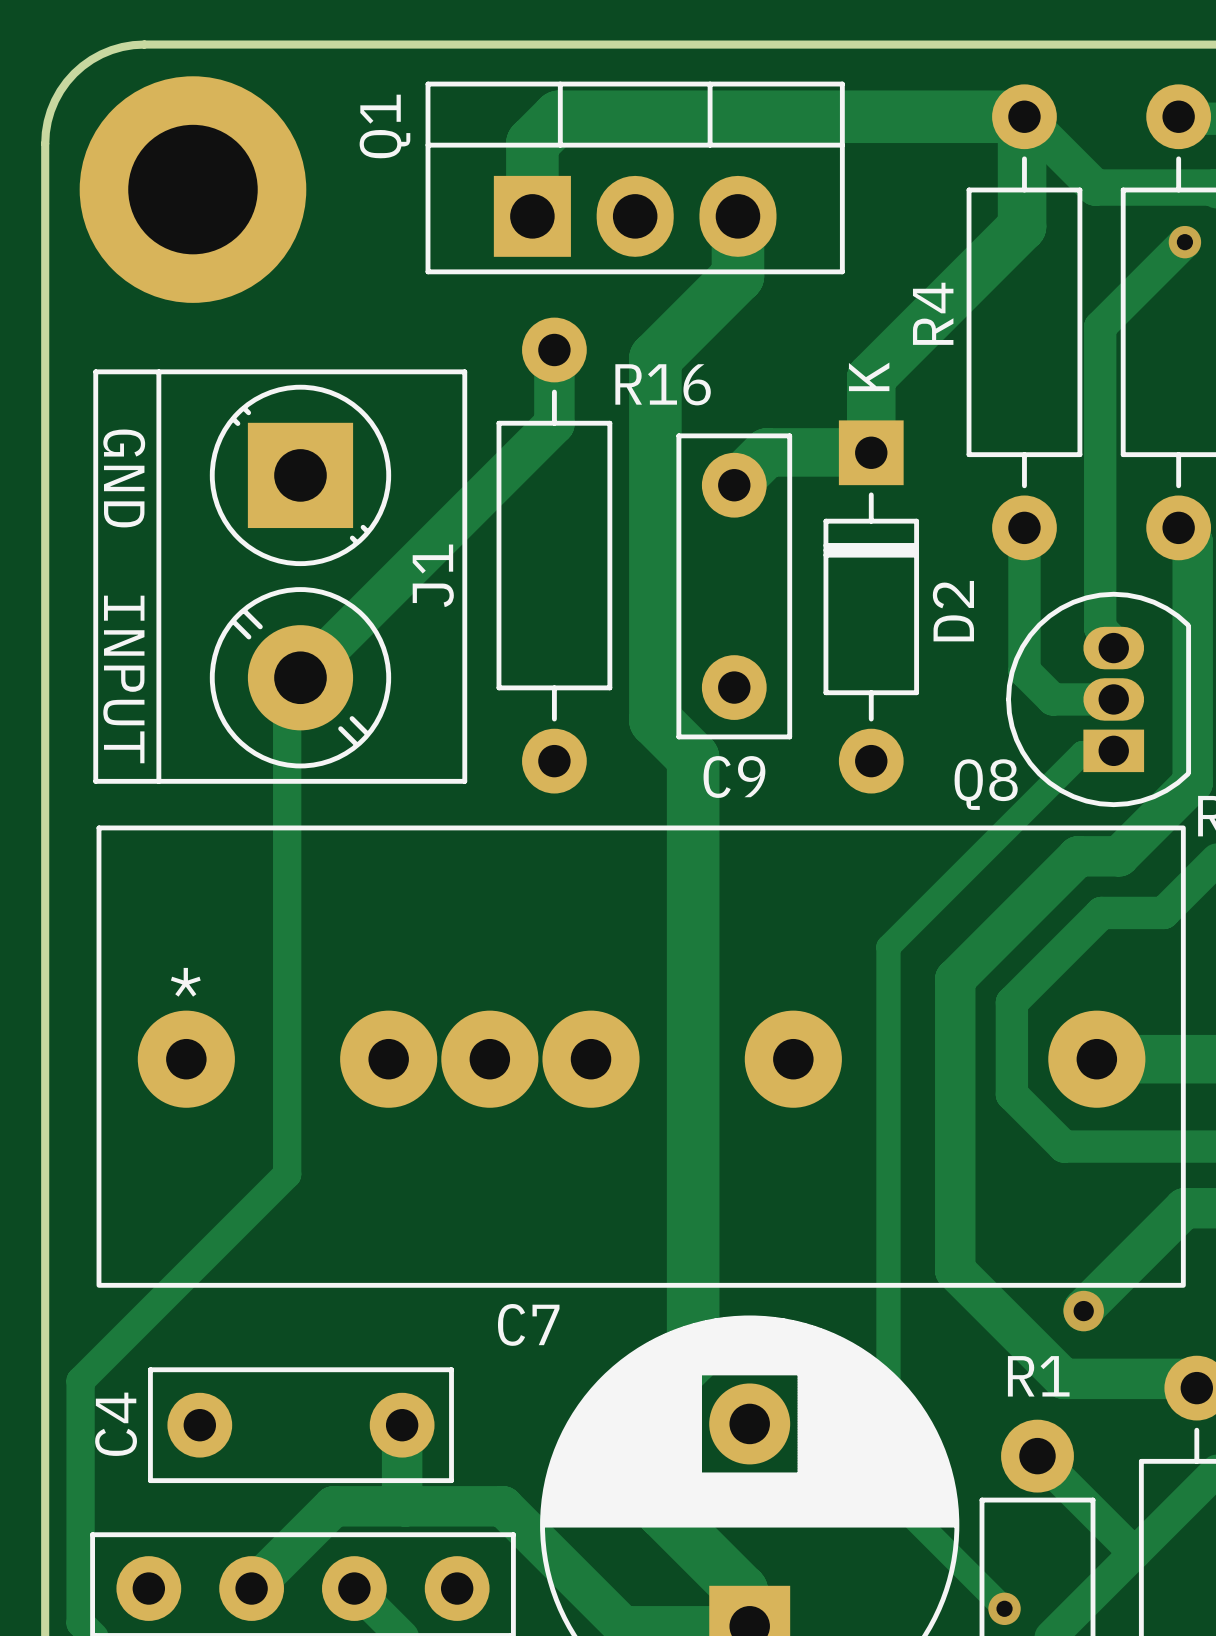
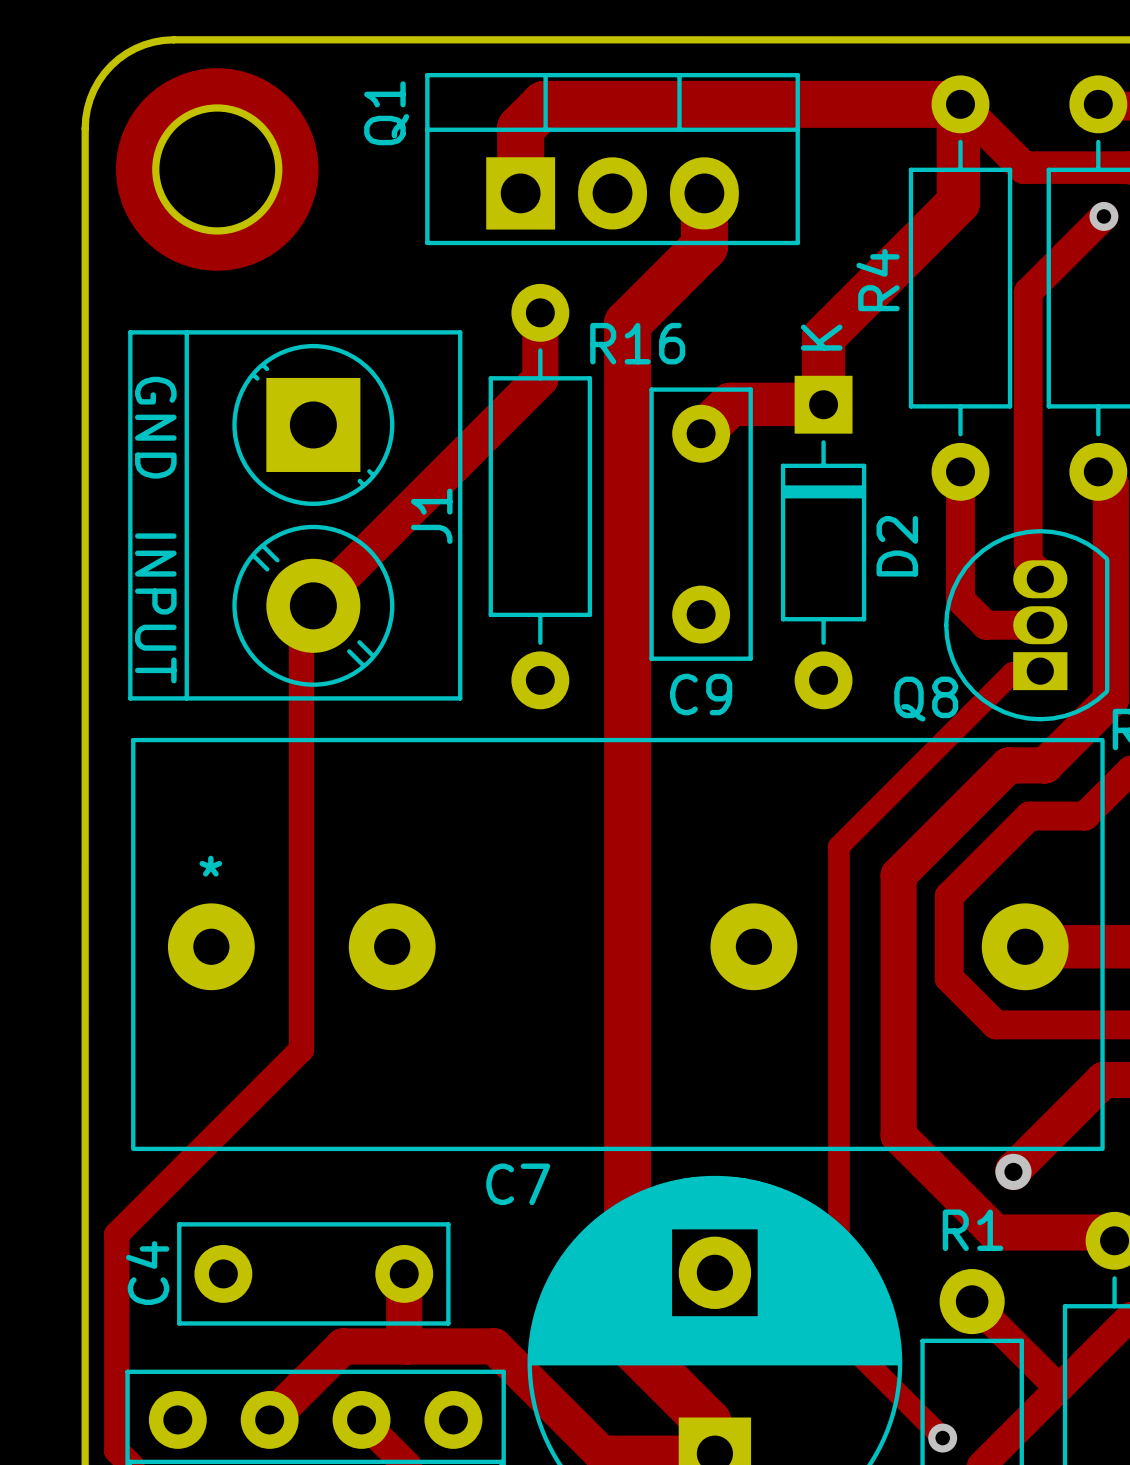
track: (655, 358) (655, 720) (693, 758) (693, 1357) (662, 1387) (662, 1511) -> (630, 320) (627, 323) (627, 1341) (637, 1351)
C7 footprint: [96, 825, 1186, 1288] -> [131, 737, 1105, 1152]

